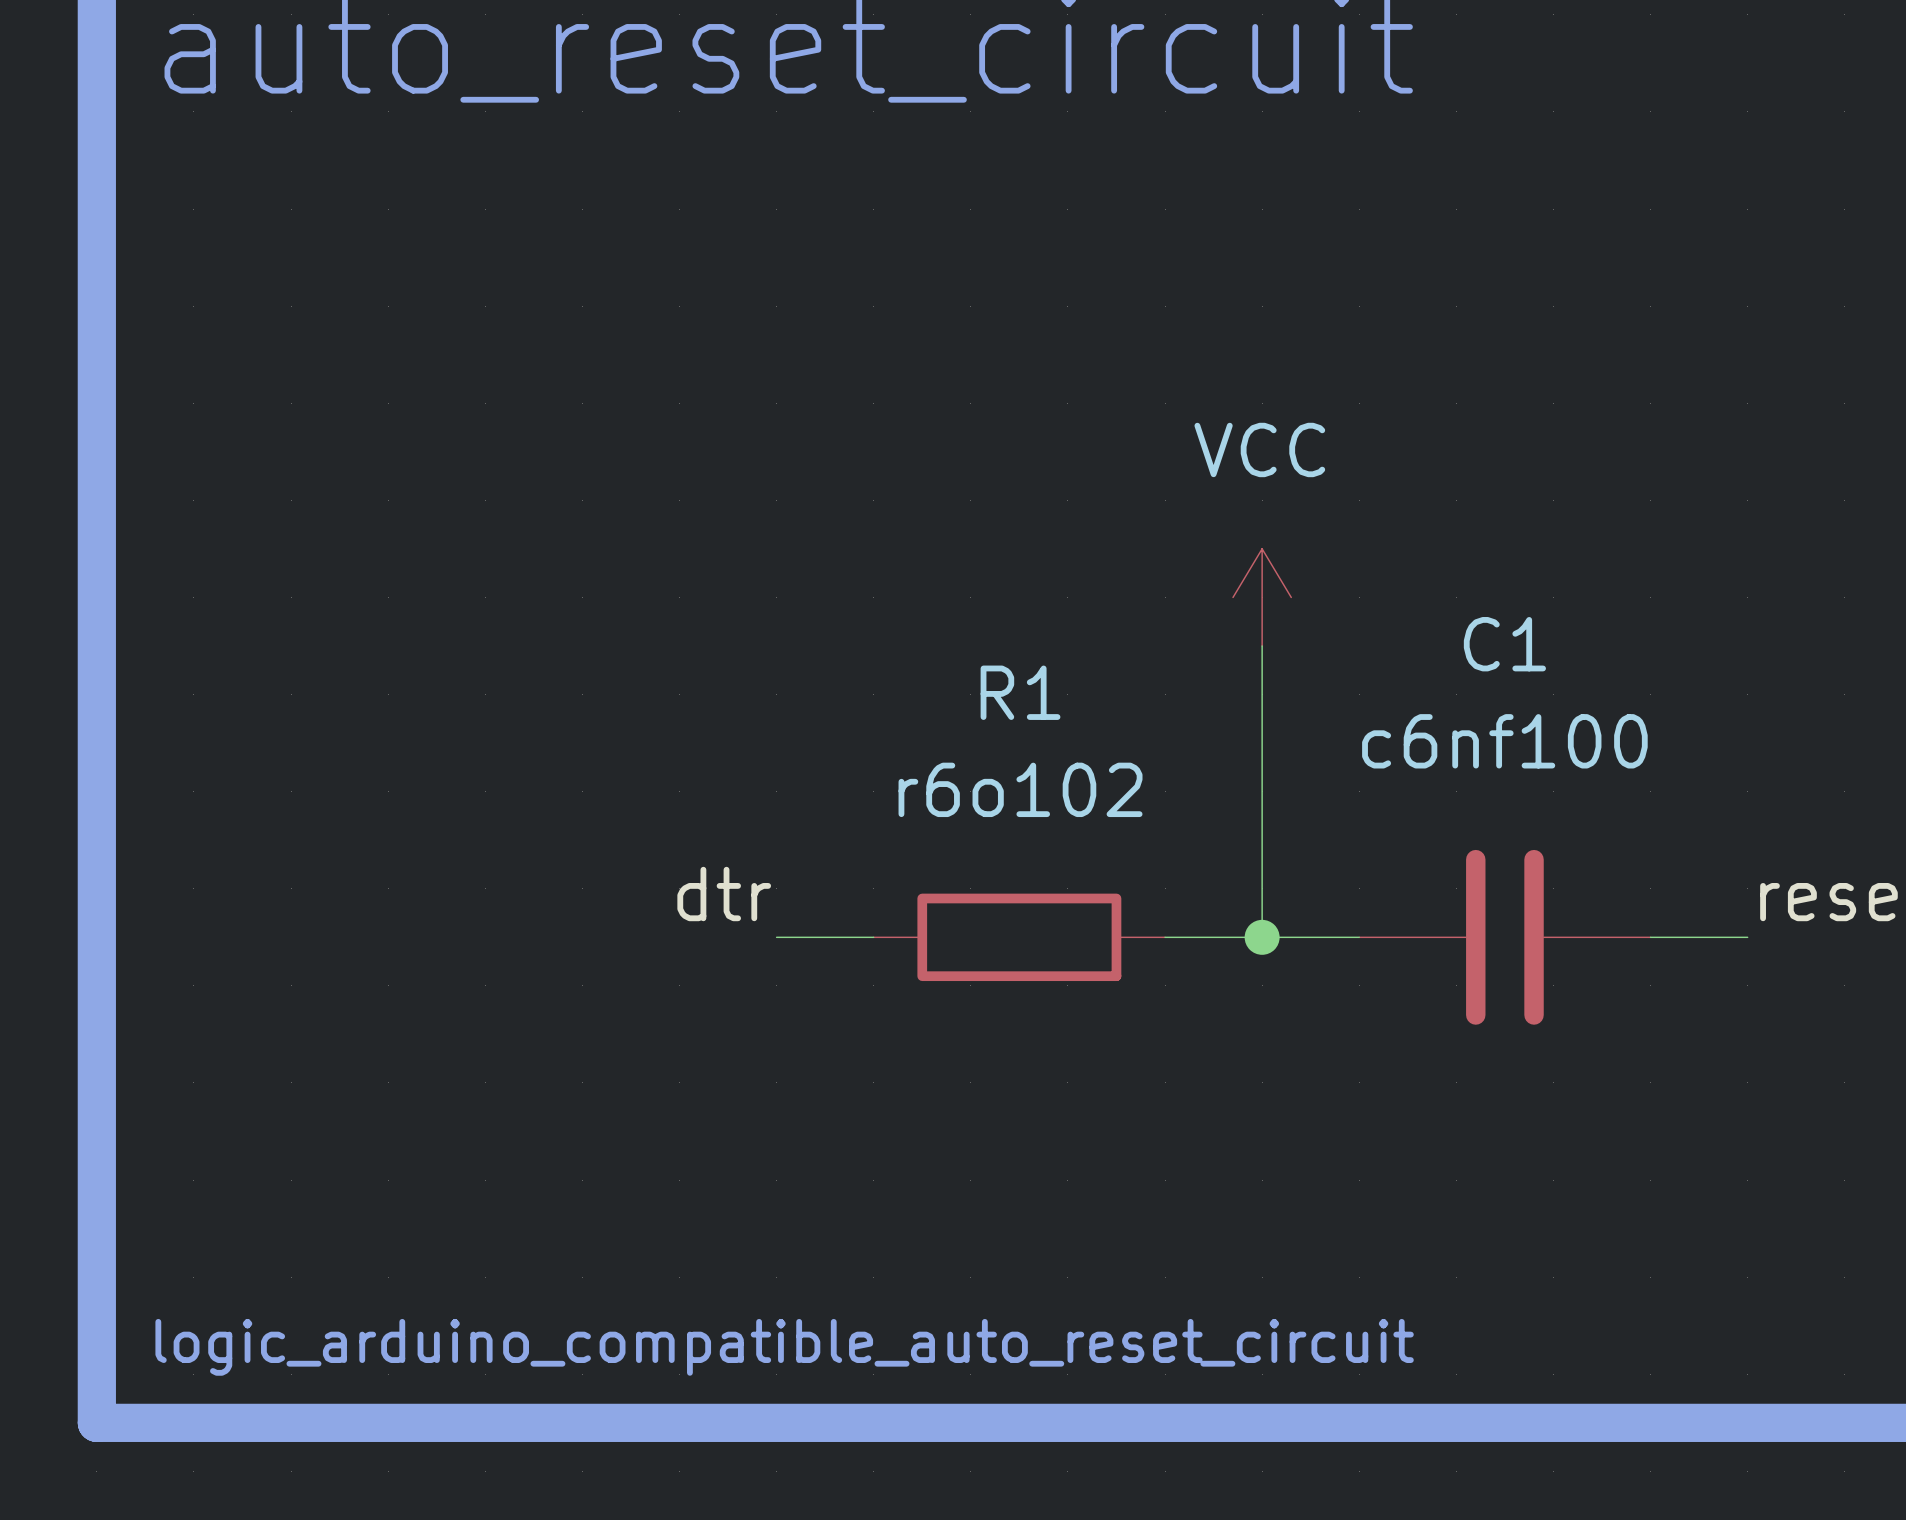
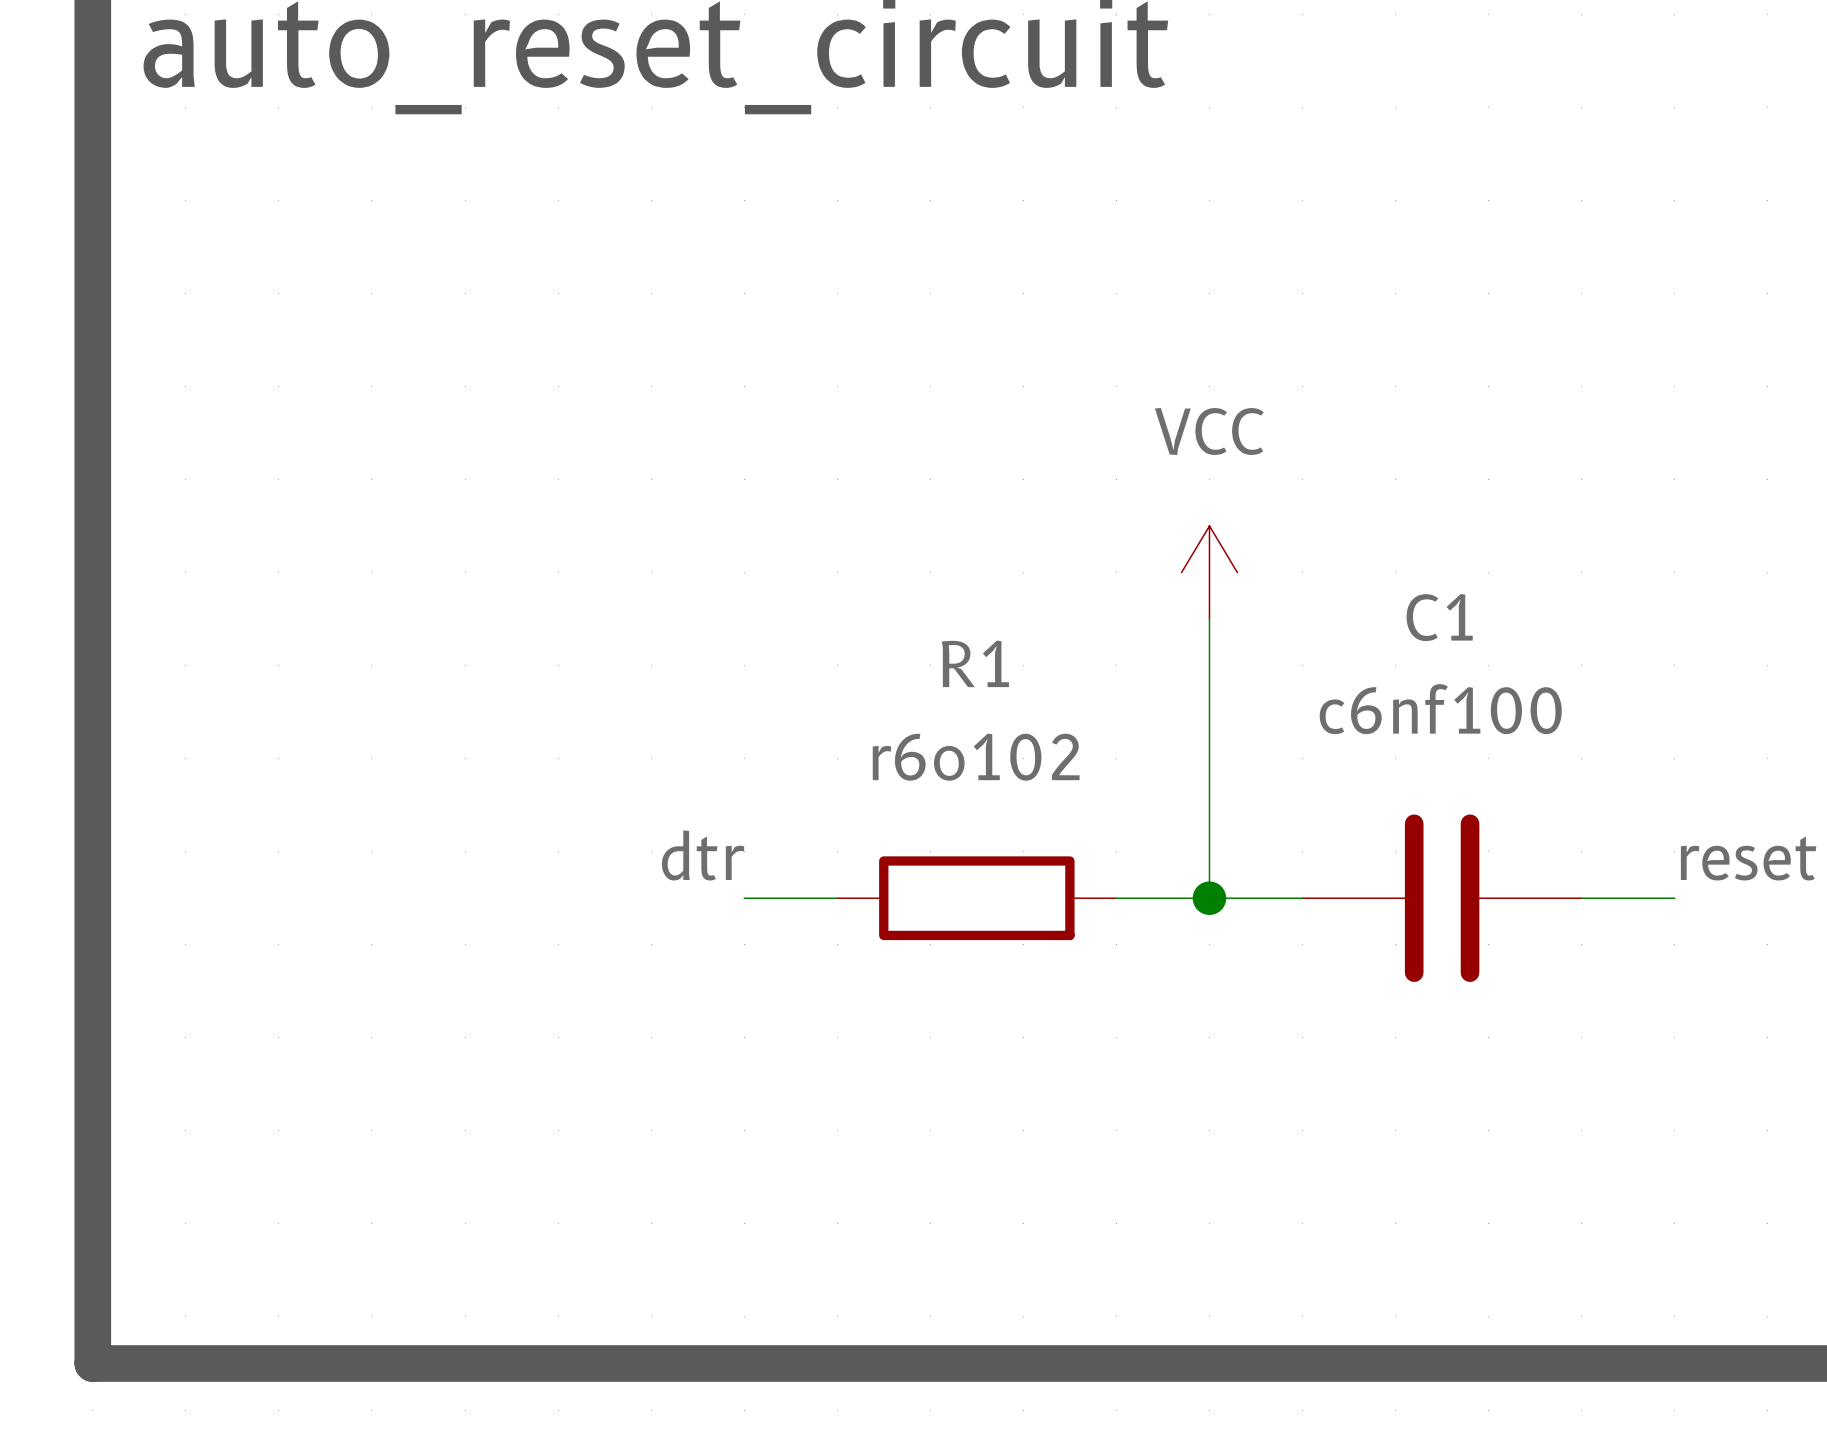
text: logic_arduino_compatible_auto_reset_circuit (784, 1347) -> none

